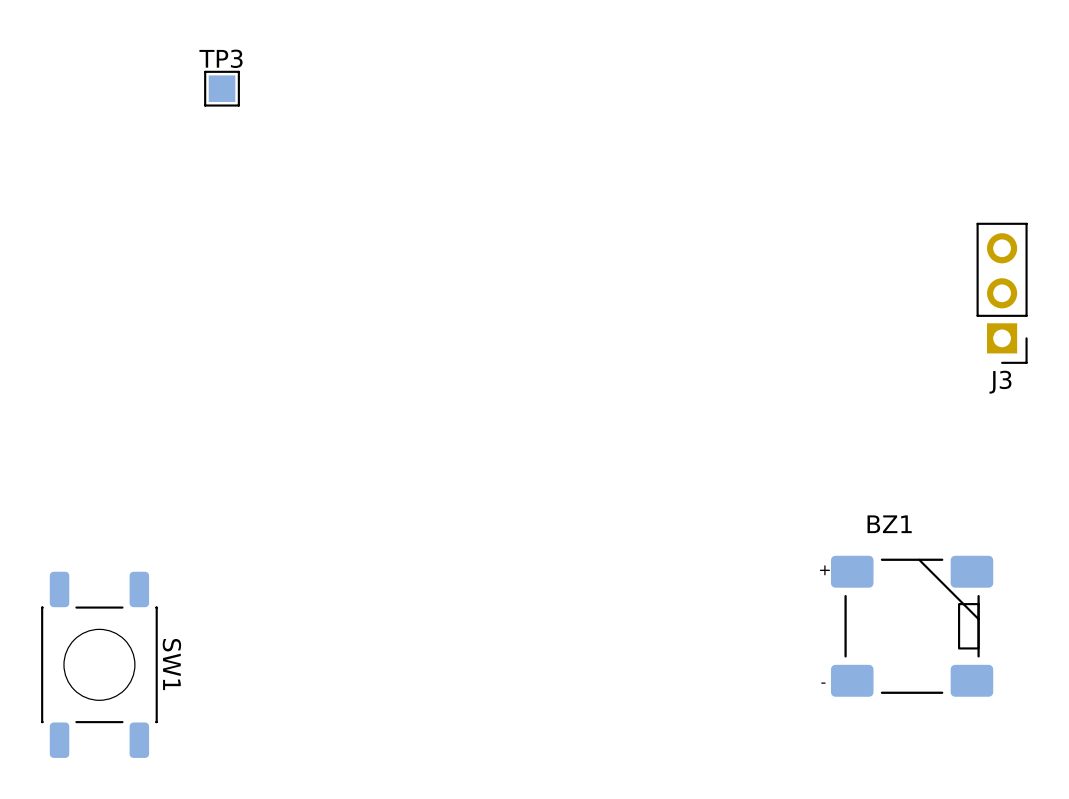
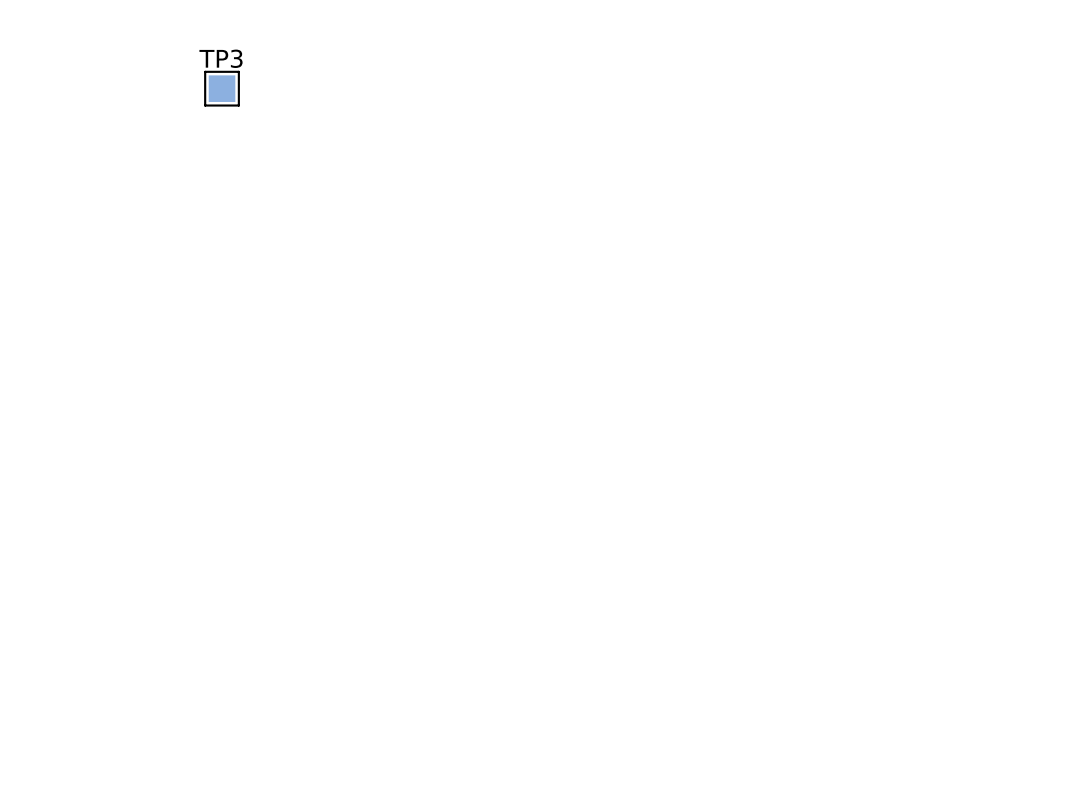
J3: (1002, 293) -> none
BZ1: (912, 626) -> none
SW1: (99, 664) -> none

